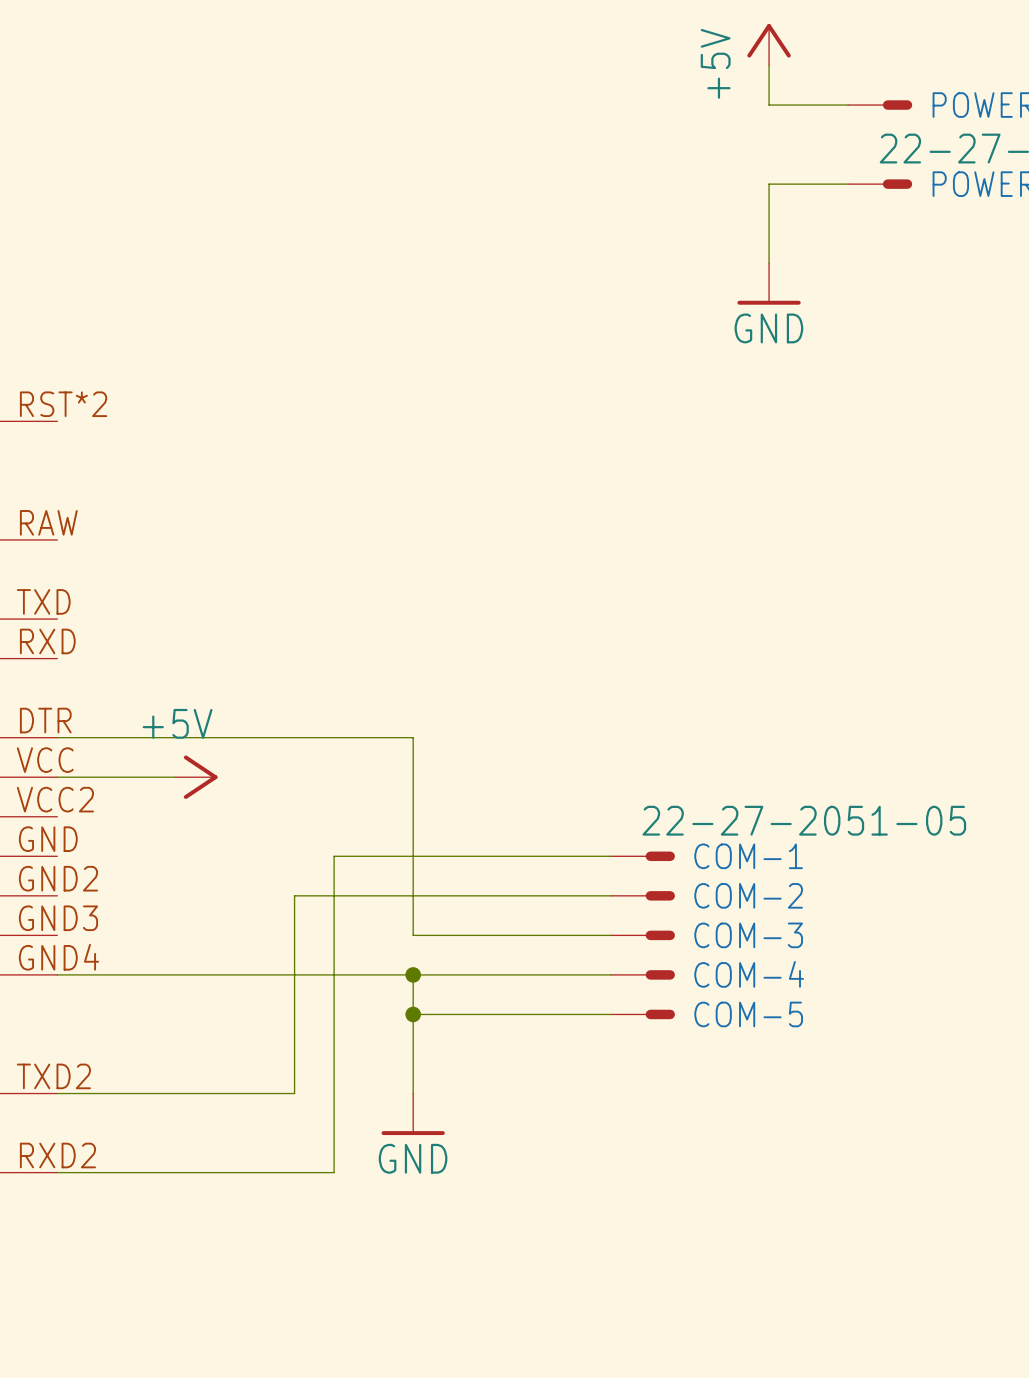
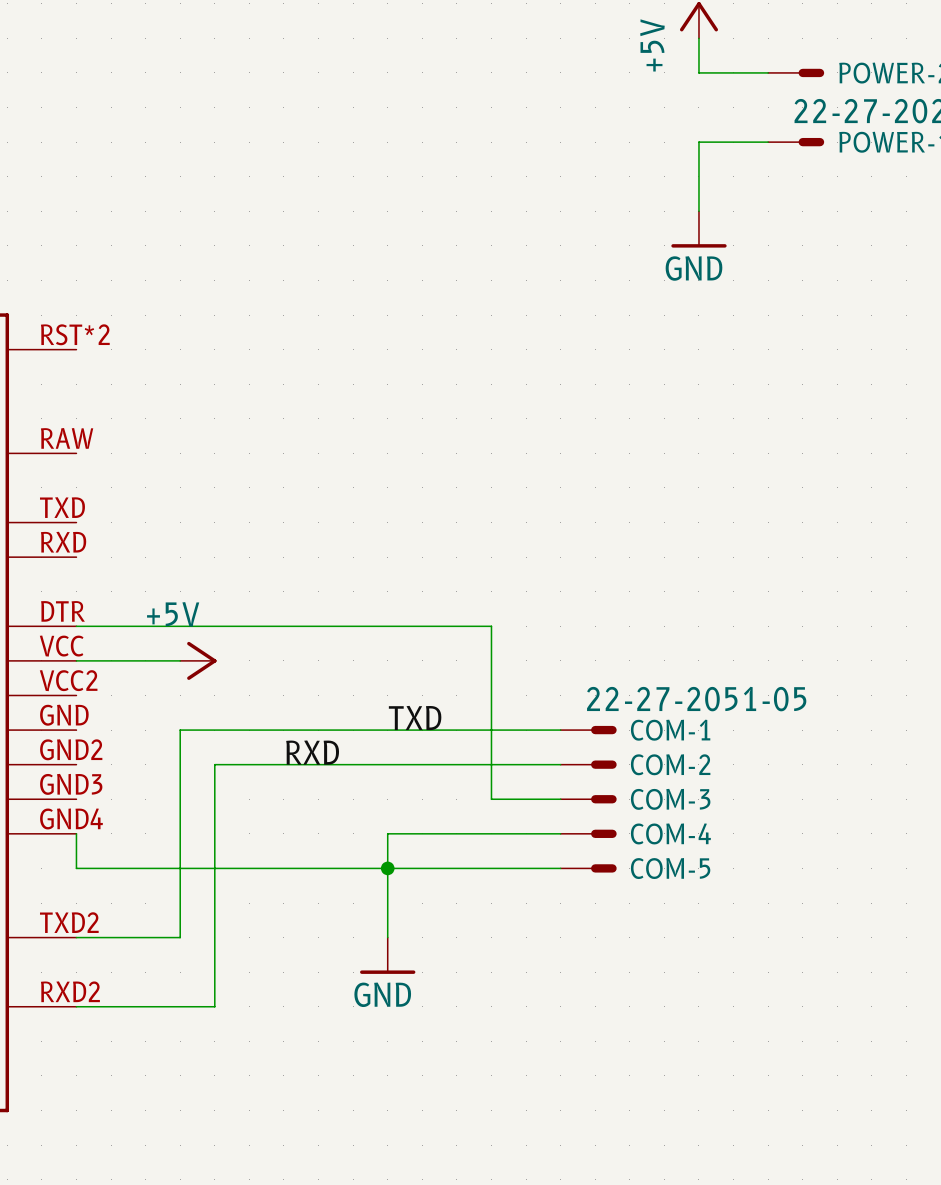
wire: (413, 737) (413, 935) (531, 935) -> (387, 626) (491, 626) (491, 799)
label: none -> TXD (415, 717)
wire: (334, 856) (334, 1172) (215, 1172) -> (283, 764) (214, 764) (214, 1006)
label: none -> RXD (312, 752)
wire: (294, 895) (294, 1093) (175, 1093) -> (318, 730) (180, 730) (180, 937)
wire: (57, 974) (413, 974) -> (76, 833) (76, 868) (387, 868)
junction: (413, 974) -> none

